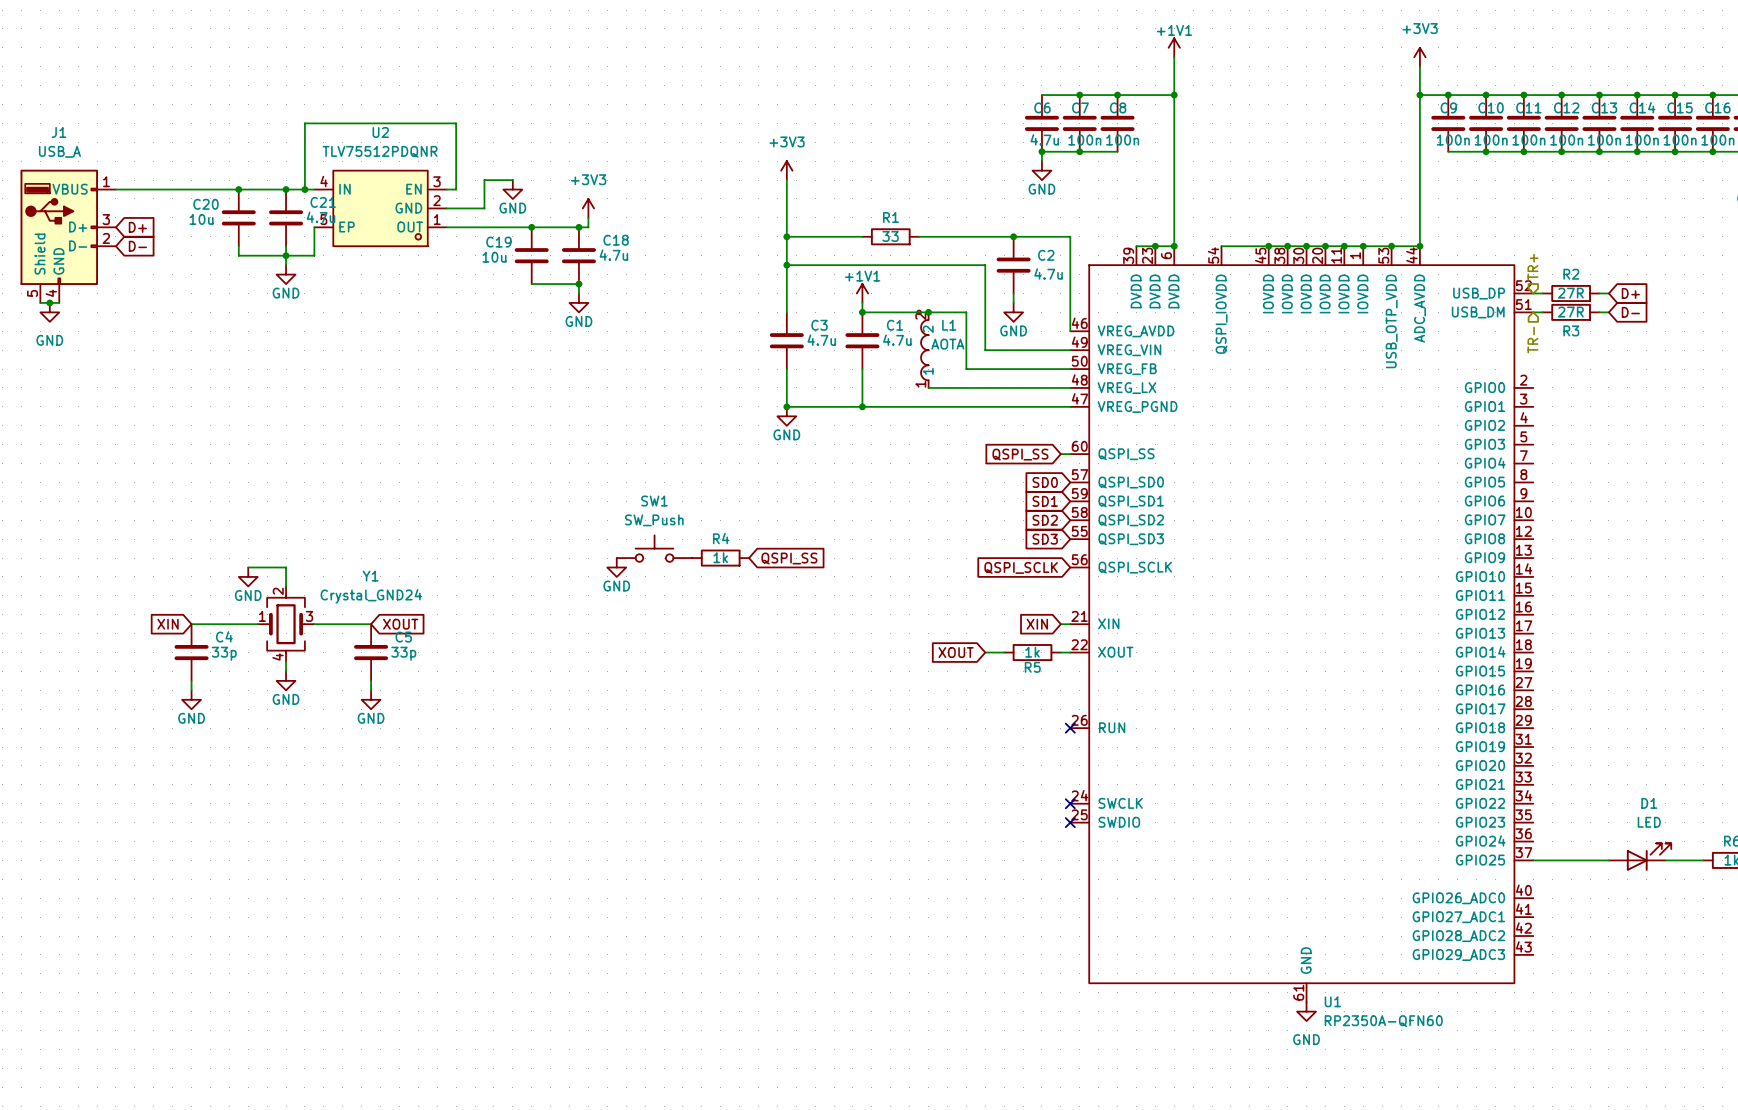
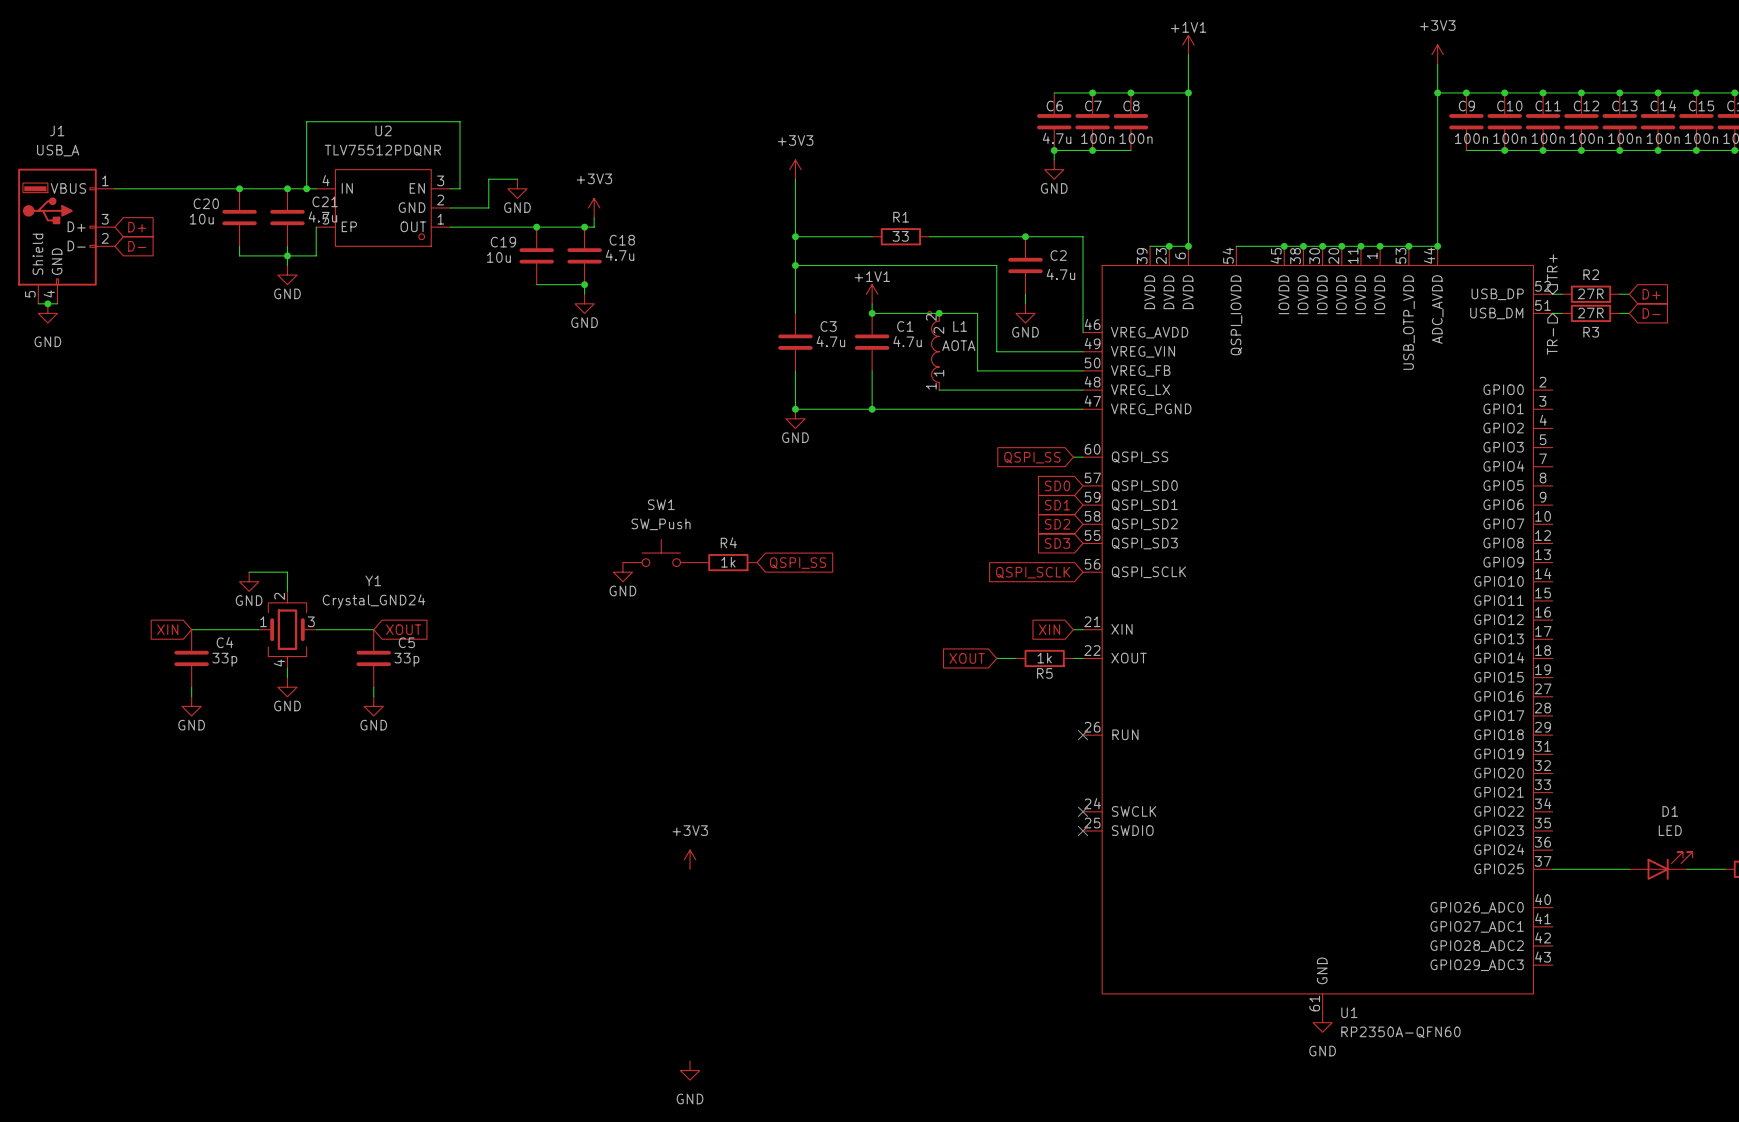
power symbol: none -> +3V3 (690, 859)
power symbol: none -> GND (690, 1070)

